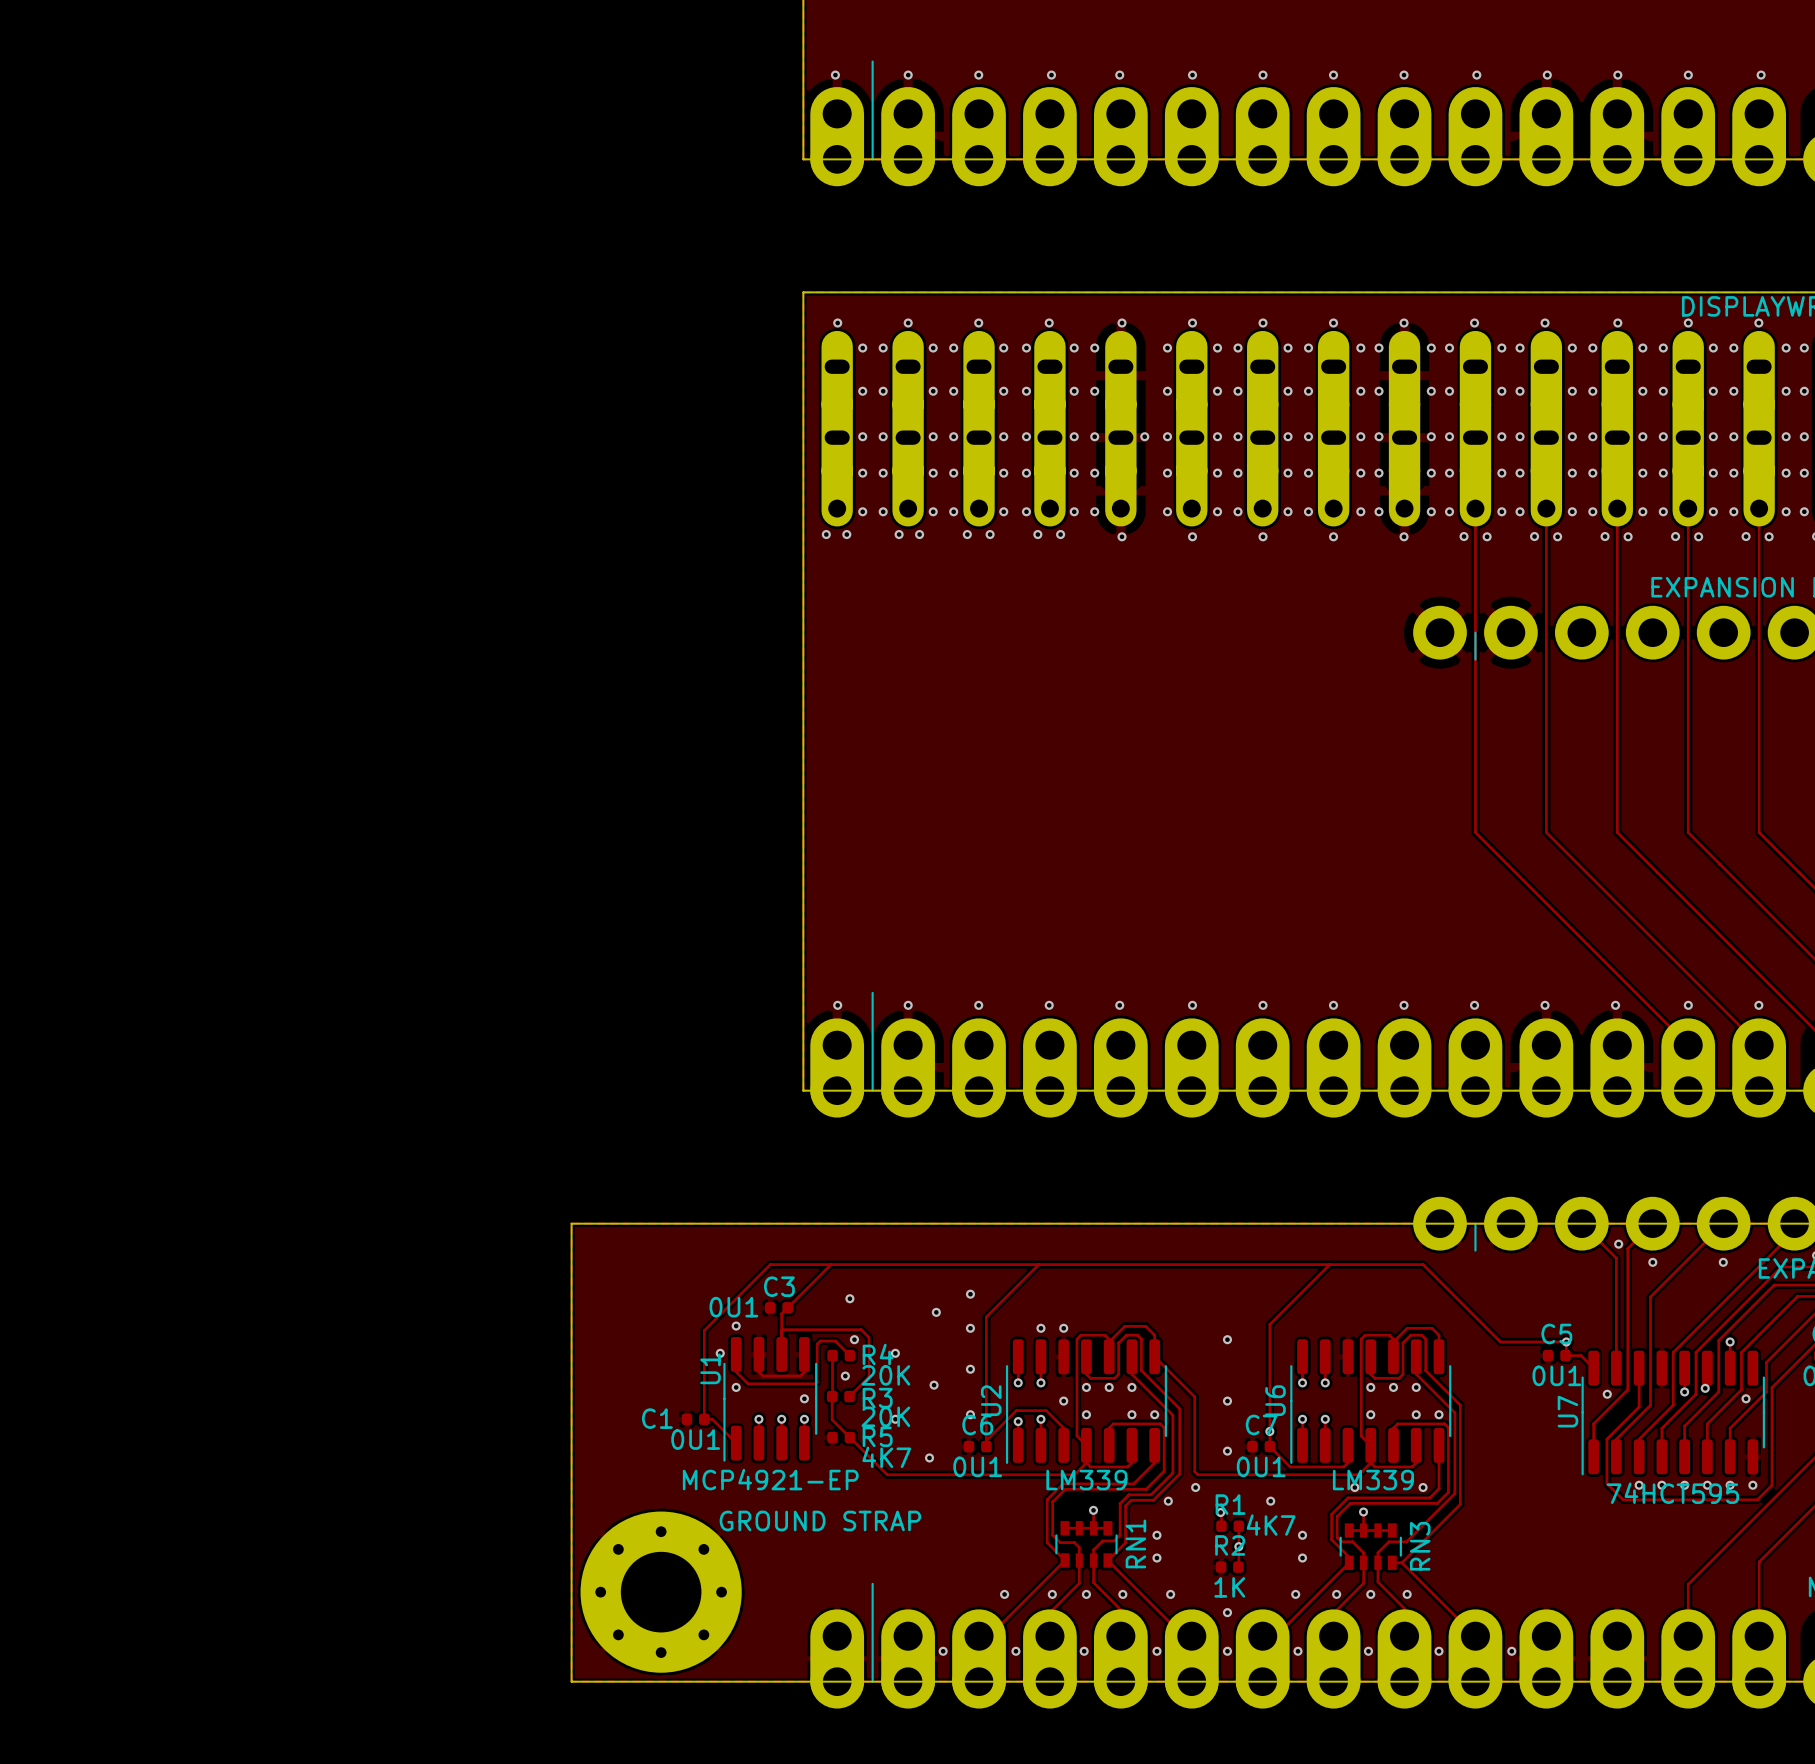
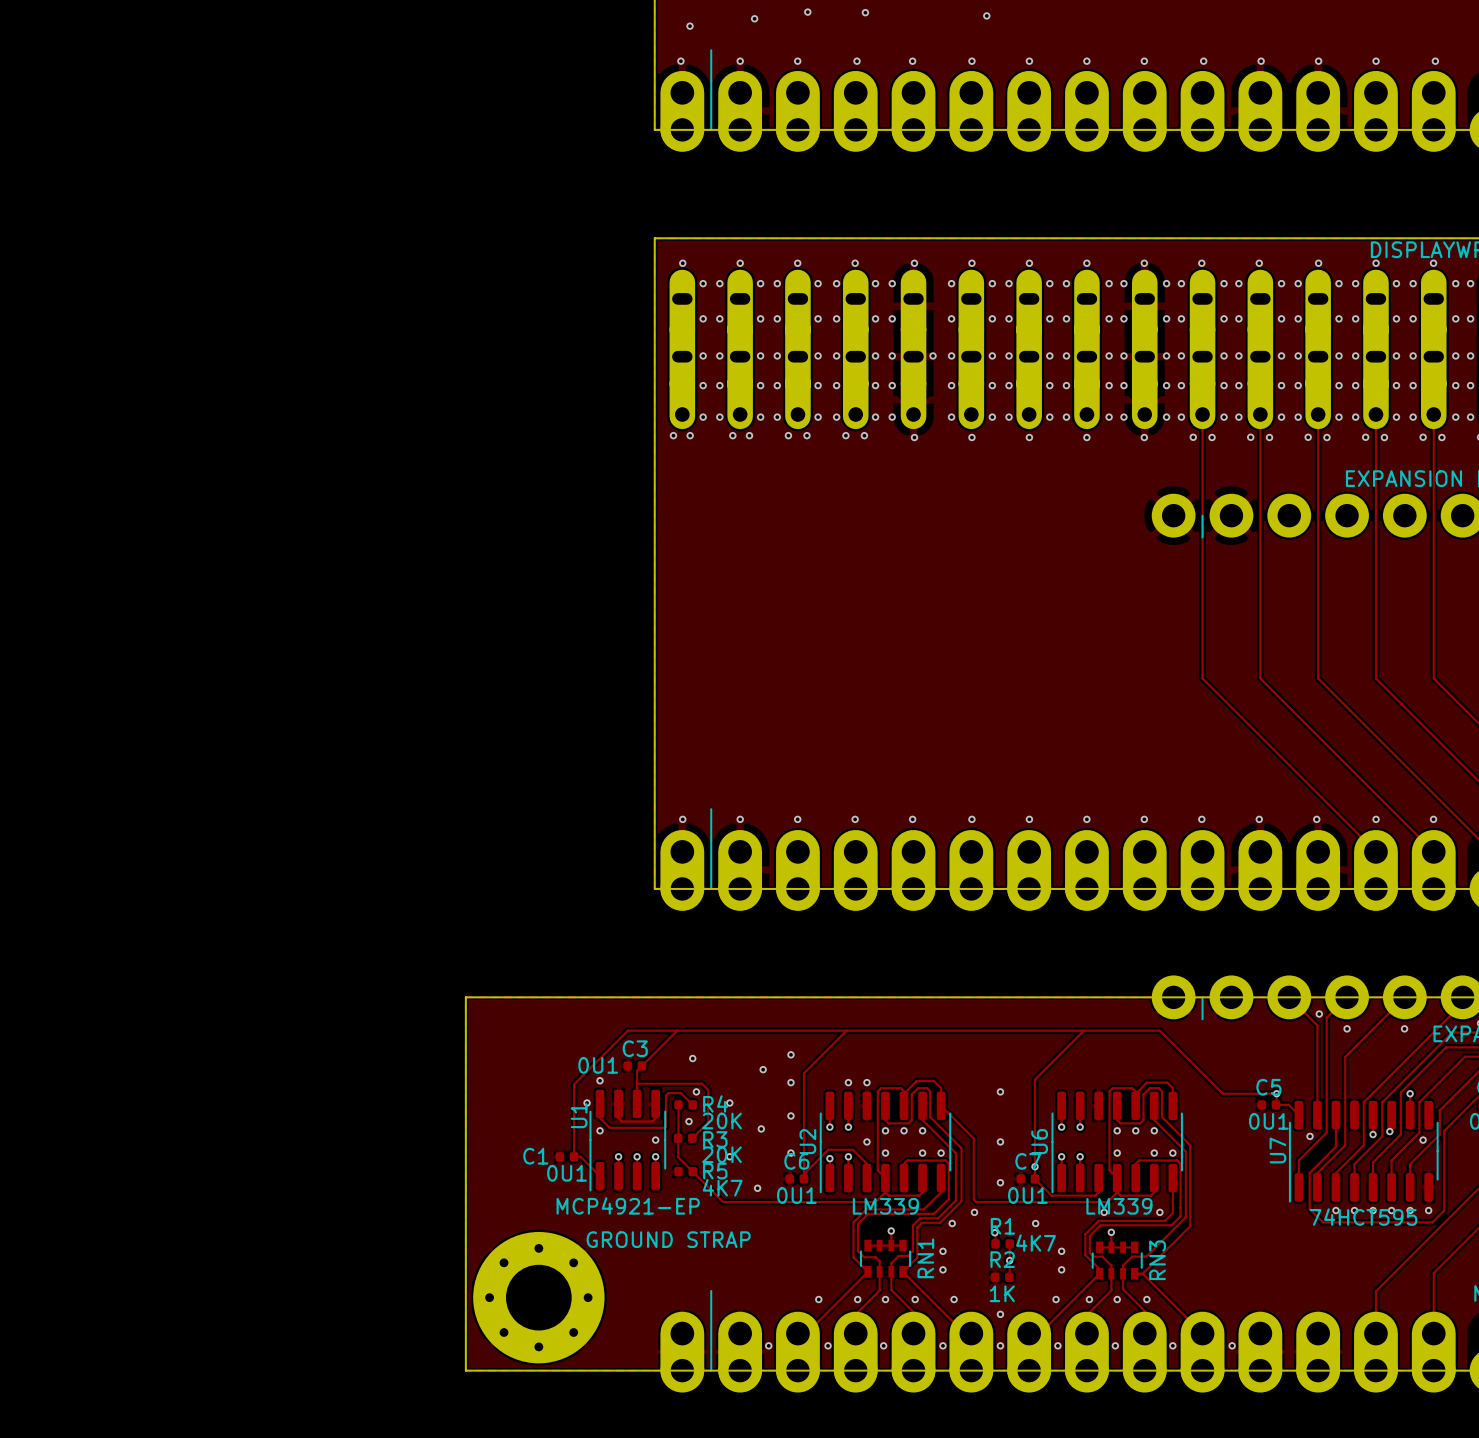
via: none -> (807, 12)
via: none -> (865, 12)
via: none -> (986, 15)
via: none -> (754, 18)
via: none -> (690, 26)

